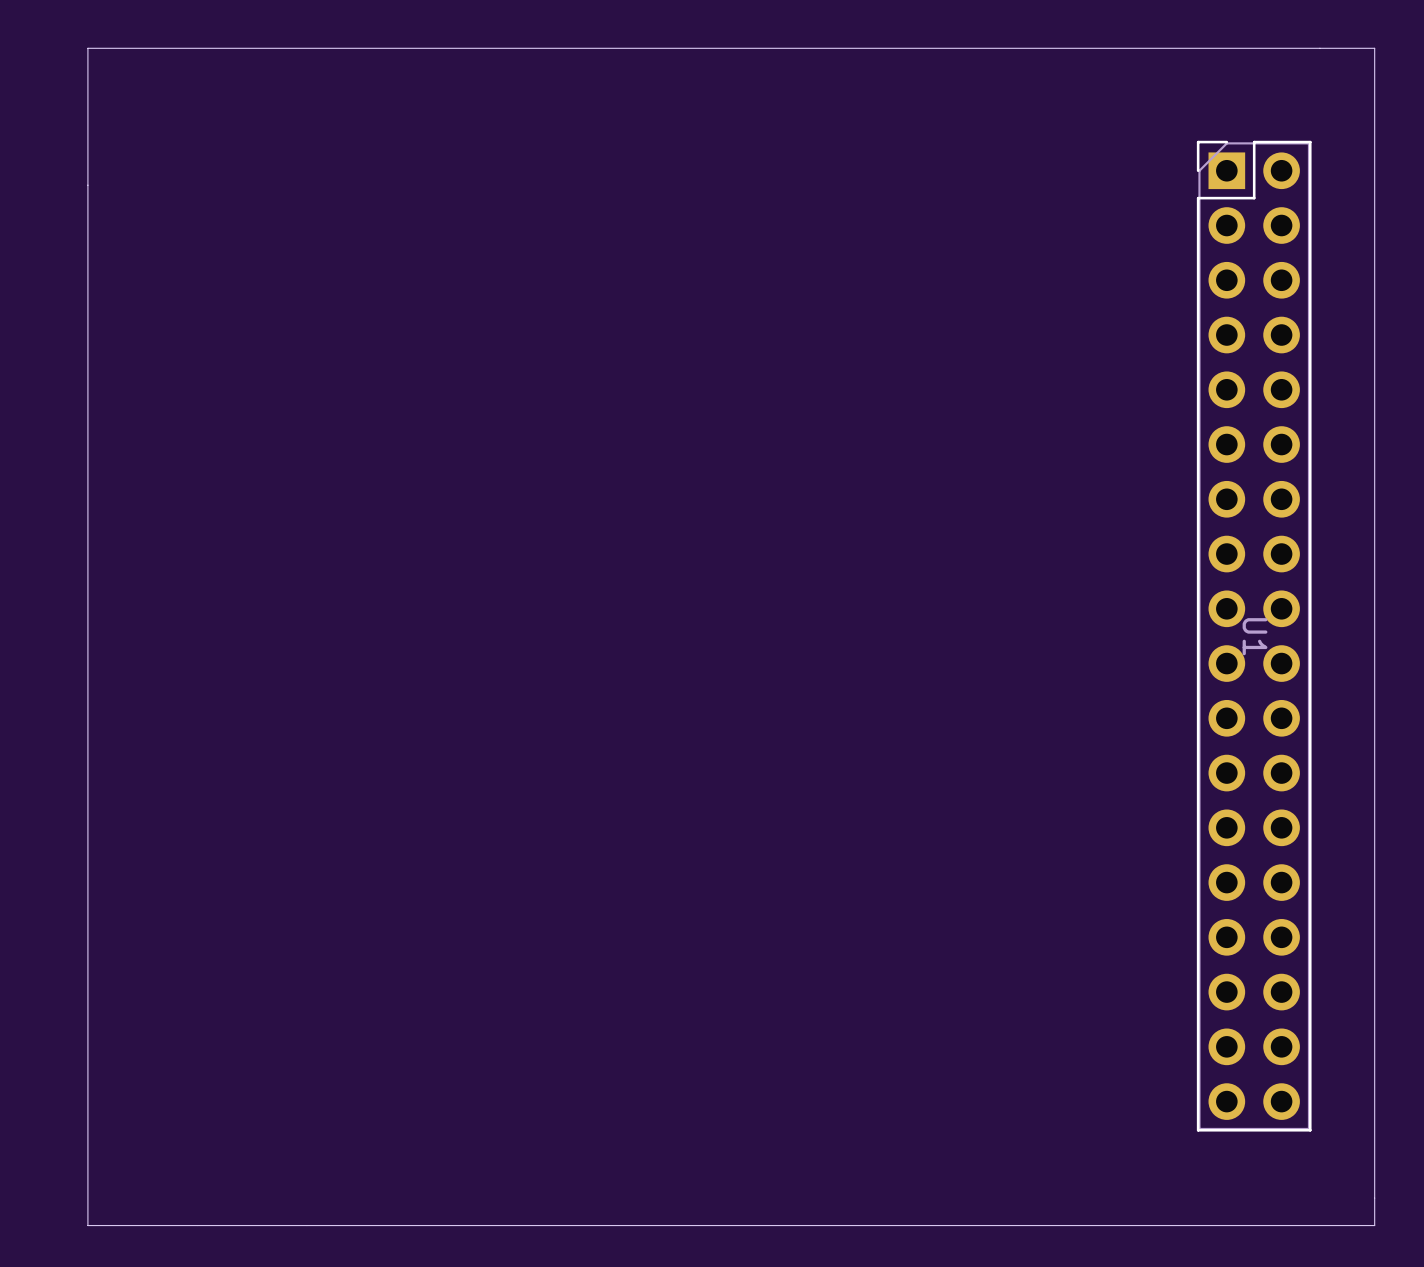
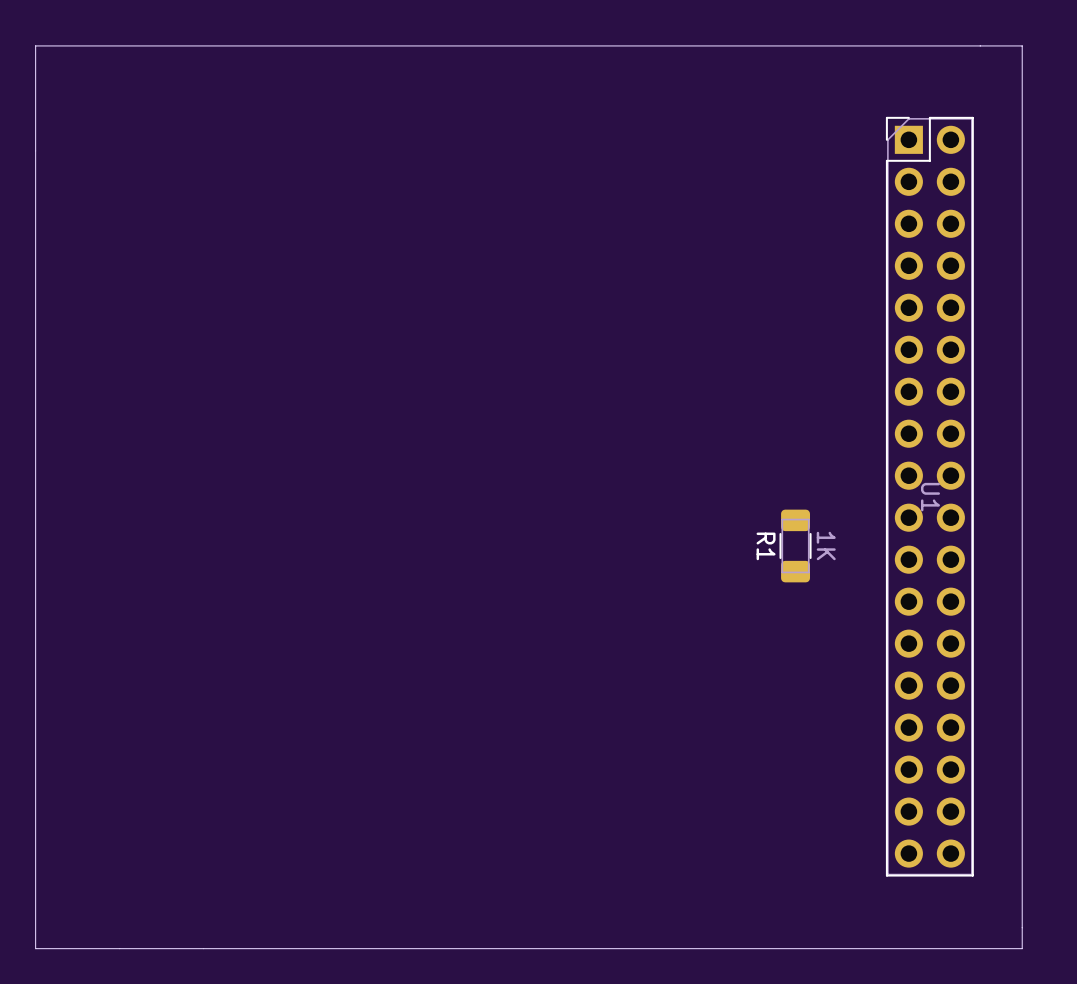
R1: none -> 1K (795, 545)

